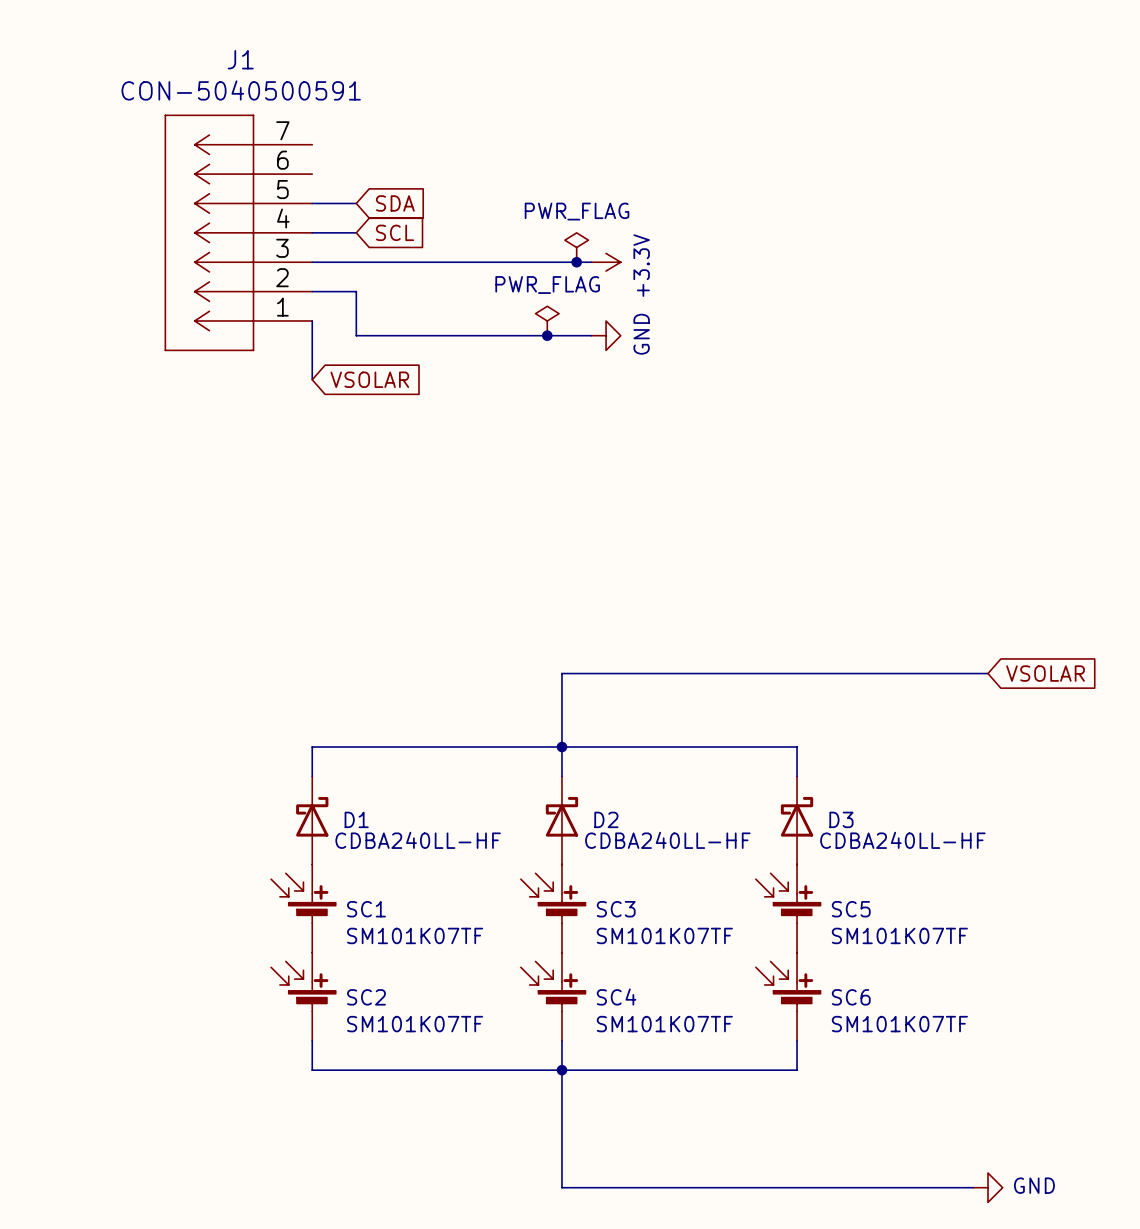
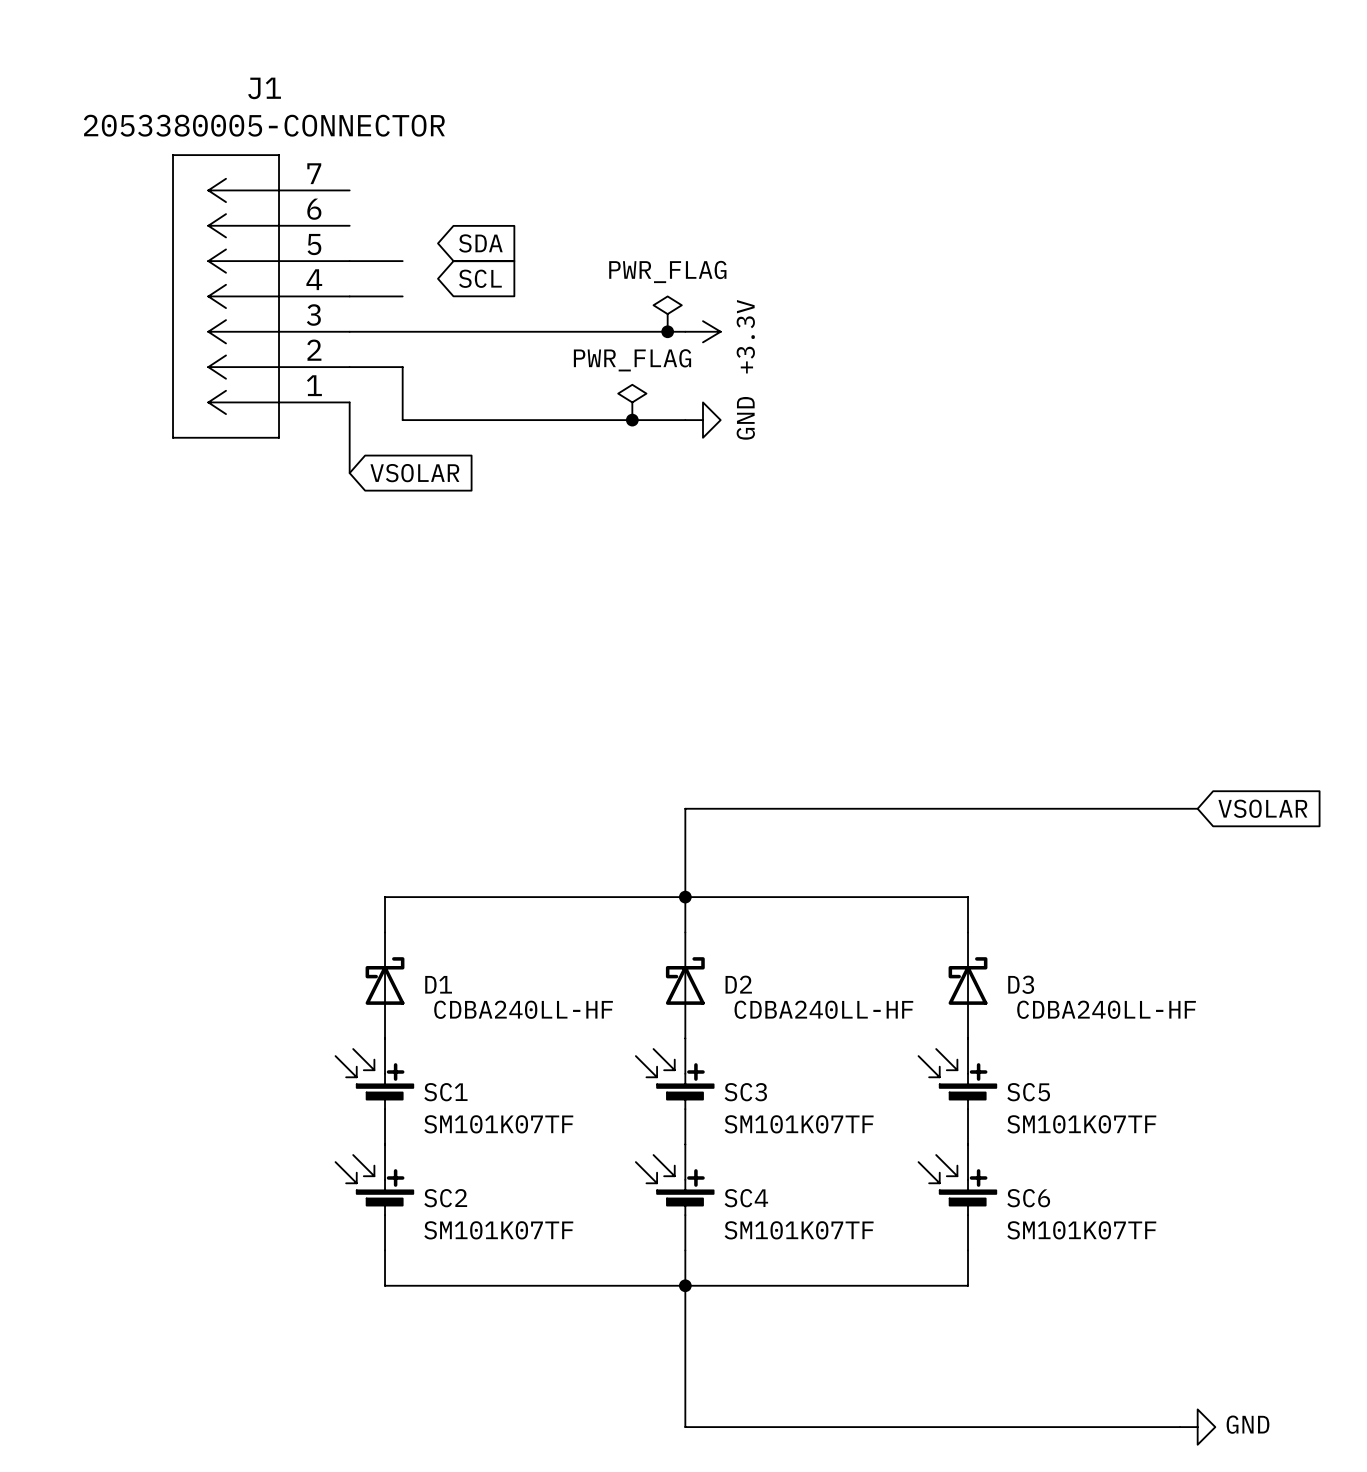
J1 value: CON-5040500591 (241, 90) -> 2053380005-CONNECTOR (264, 125)
wire: (312, 203) (356, 203) -> (349, 261) (402, 261)
J1 position: (238, 232) -> (260, 296)
wire: (312, 232) (356, 232) -> (349, 296) (402, 296)
power symbol: PWR_FLAG (576, 247) -> none
wire: (312, 262) (591, 262) -> (349, 331) (685, 331)
power symbol: none -> PWR_FLAG (667, 314)
junction: (576, 262) -> none
power symbol position: +3.3V (606, 262) -> +3.3V (703, 331)
junction: none -> (667, 331)
wire: (312, 291) (356, 291) (356, 335) (591, 335) -> (349, 367) (402, 367) (402, 420) (685, 420)
wire: (312, 320) (312, 379) -> (349, 402) (349, 473)
power symbol: PWR_FLAG (547, 320) -> none
power symbol: none -> PWR_FLAG (632, 402)
junction: (547, 335) -> none
power symbol position: GND (606, 335) -> GND (703, 420)
junction: none -> (632, 420)
global label position: VSOLAR (369, 379) -> VSOLAR (414, 473)

